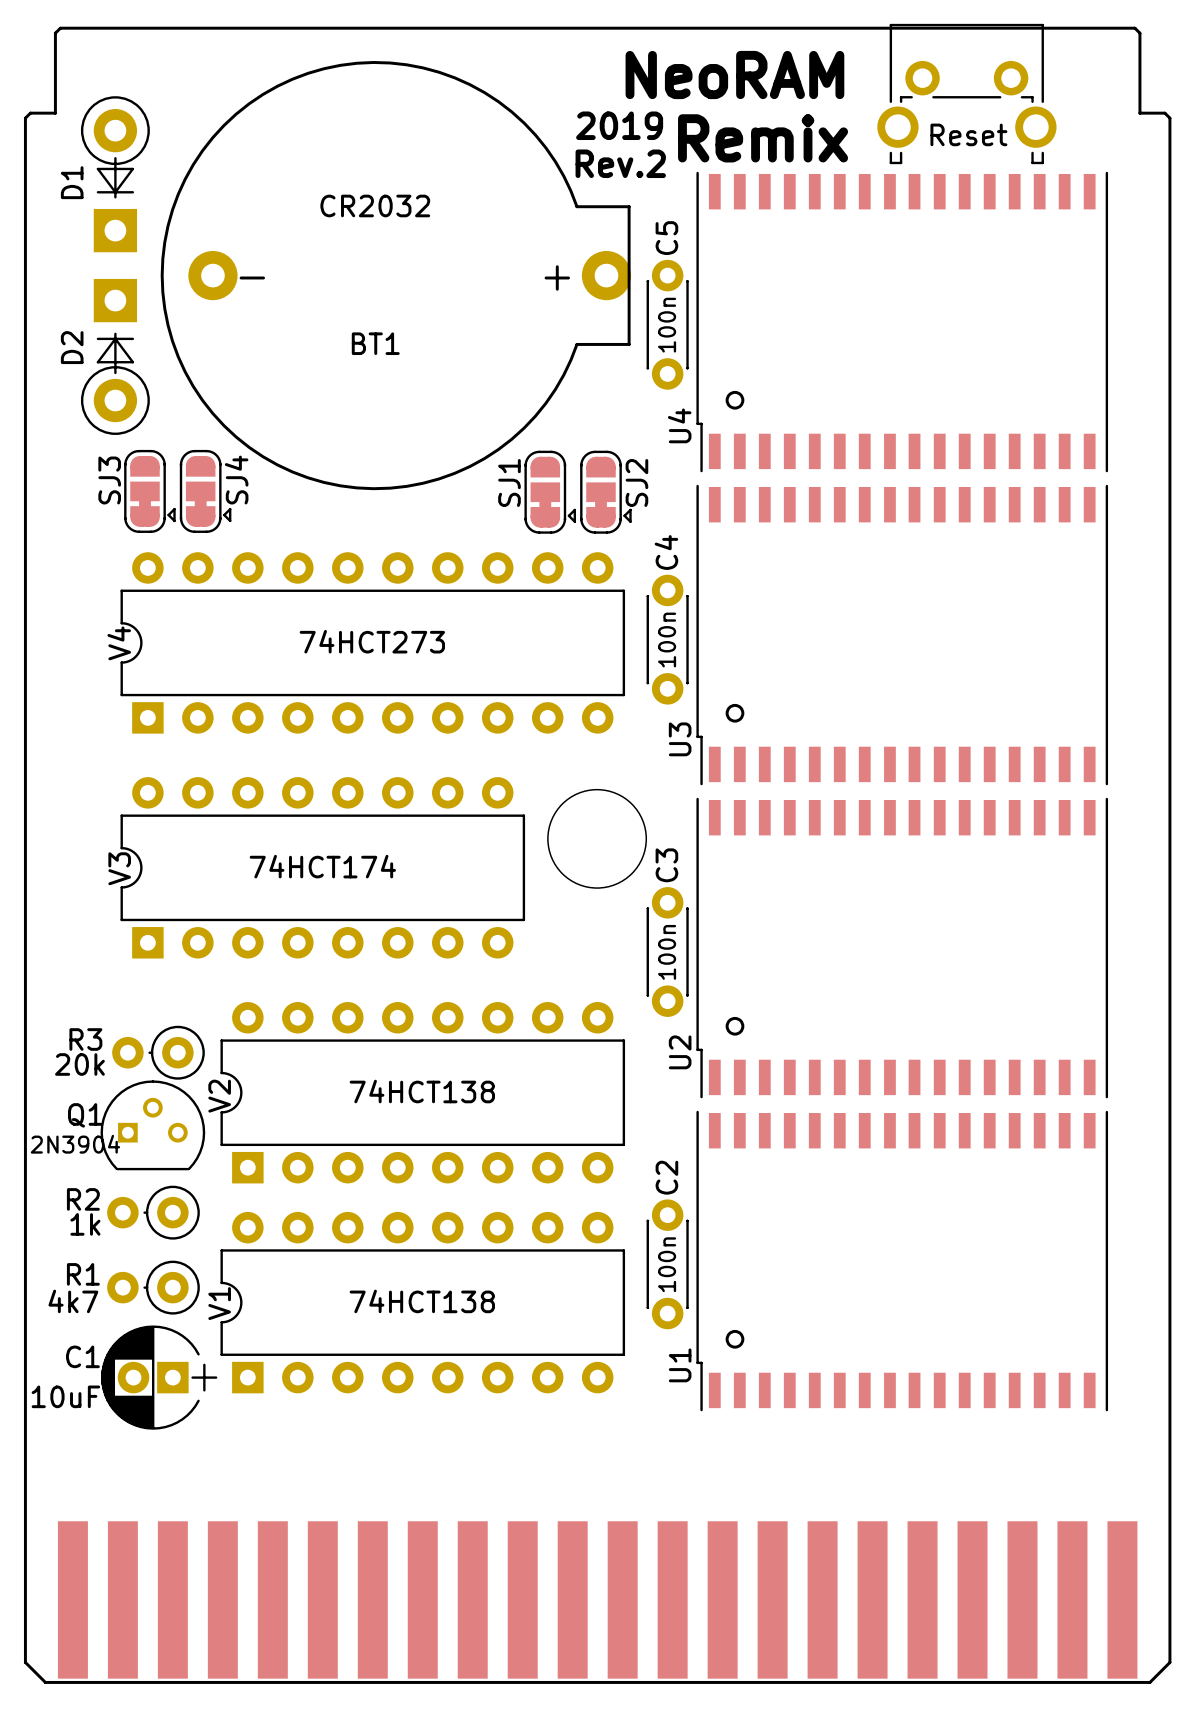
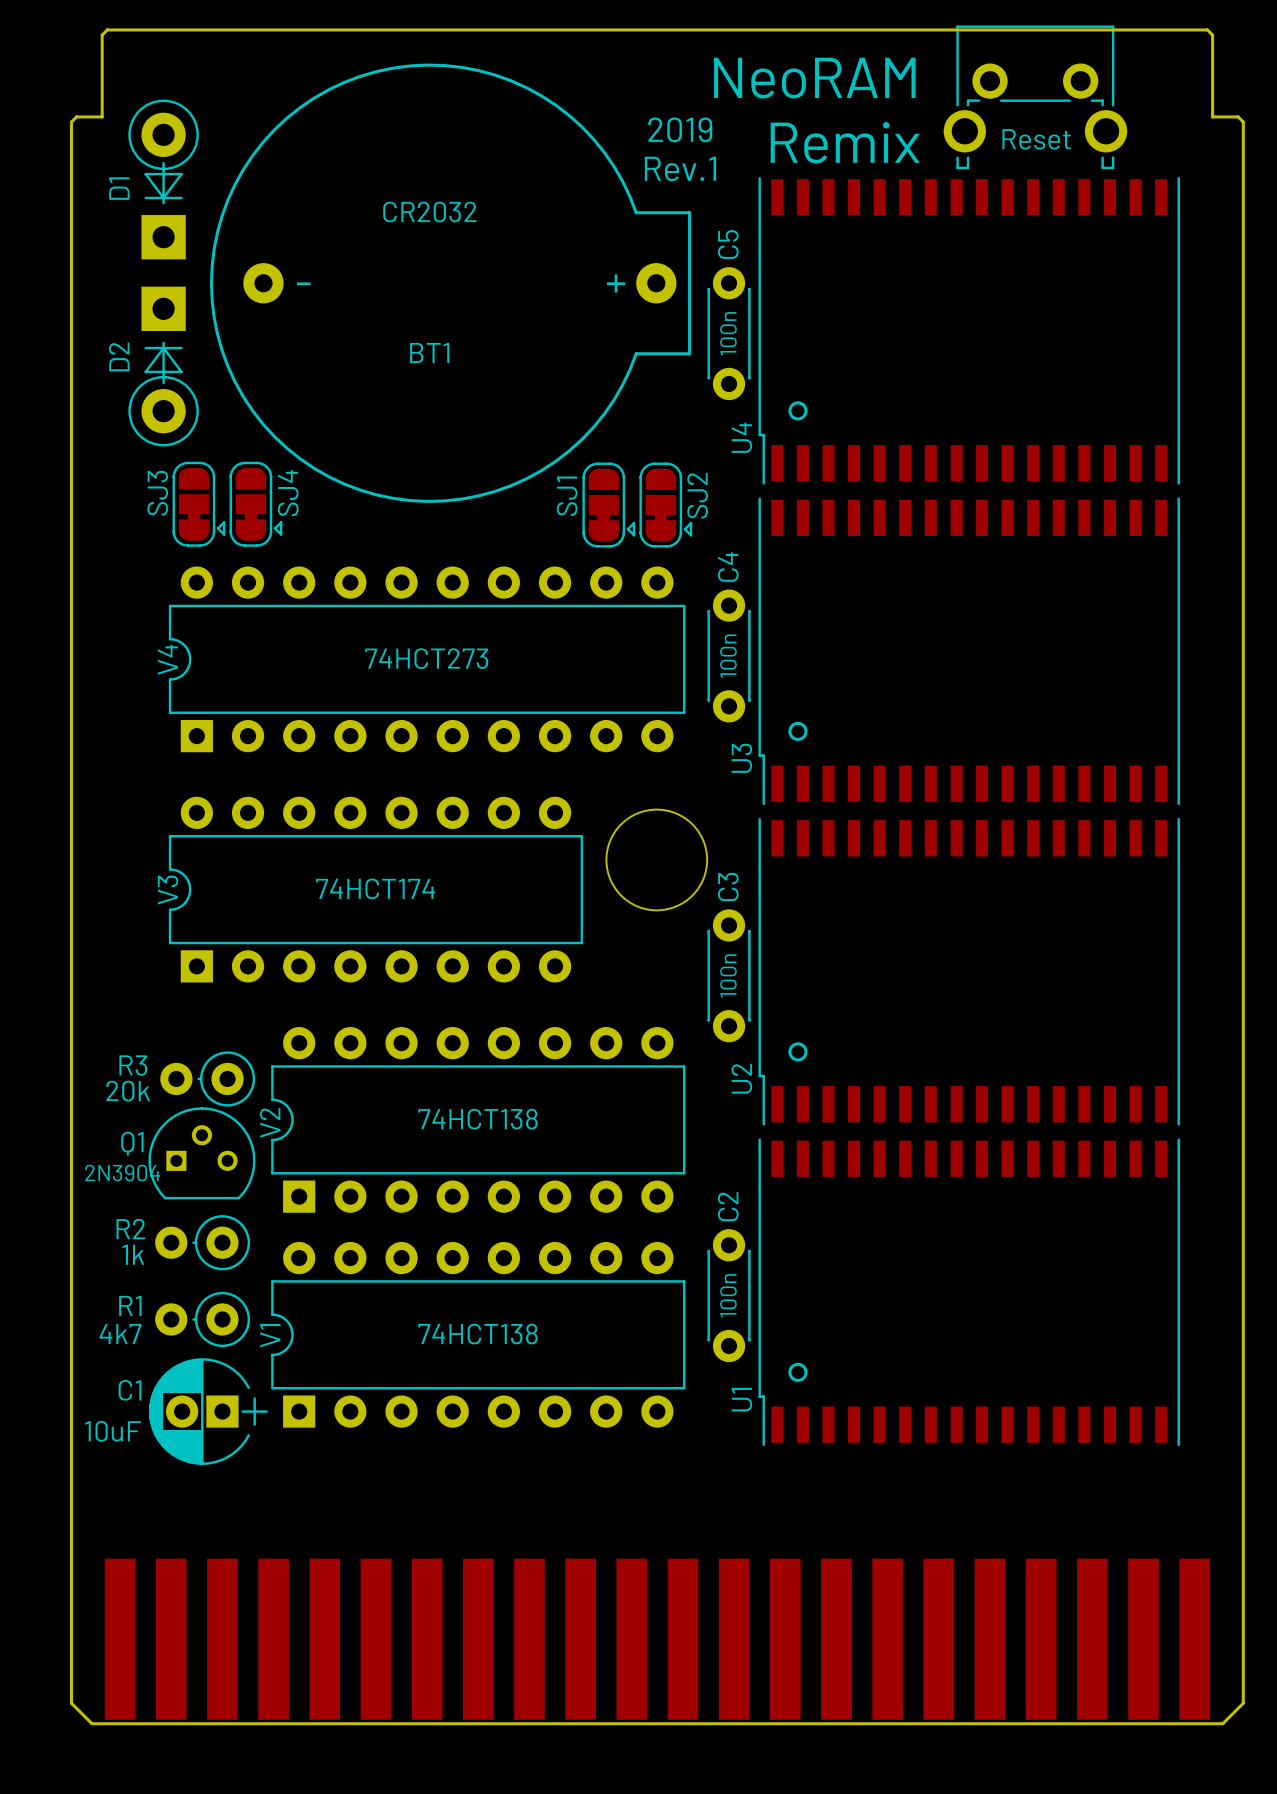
BT1 footprint: [160, 61, 632, 491] -> [209, 63, 692, 503]
text: Rev.2 (620, 163) -> Rev.1 (680, 168)

